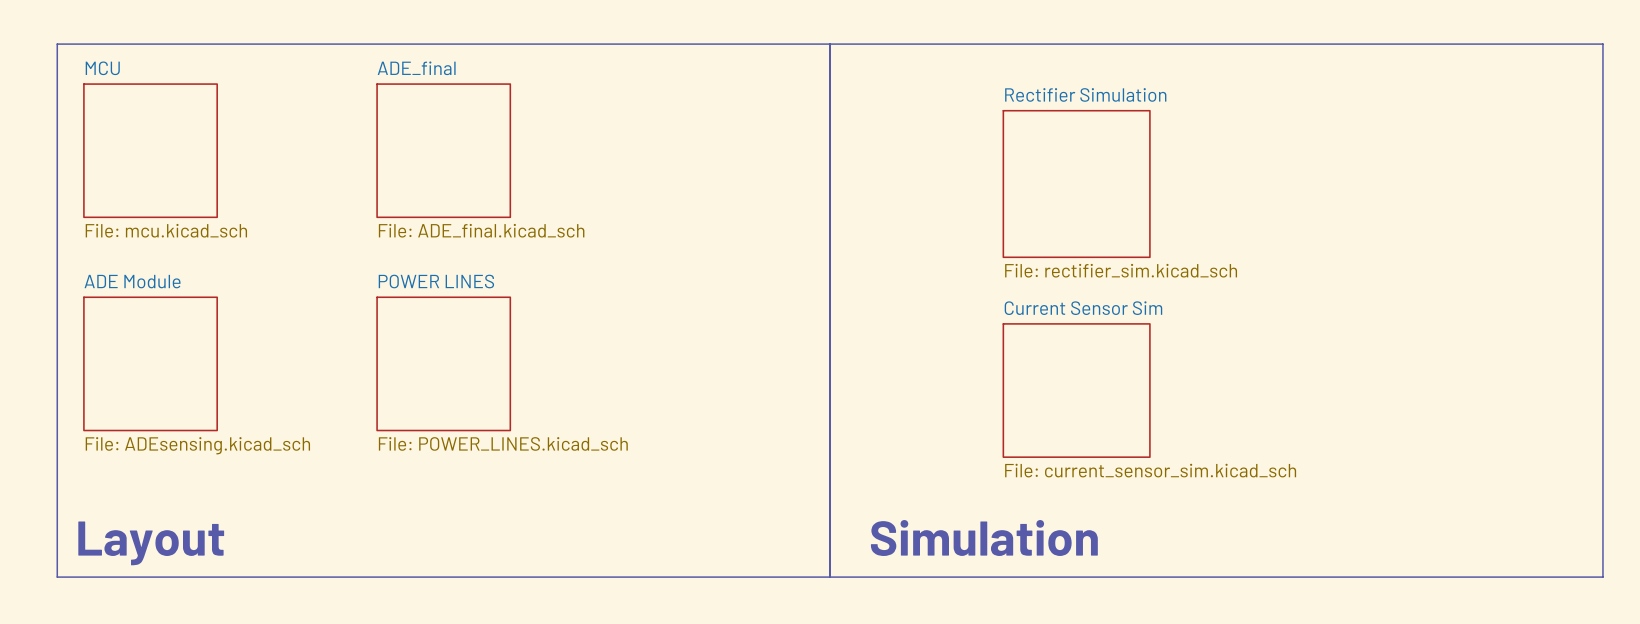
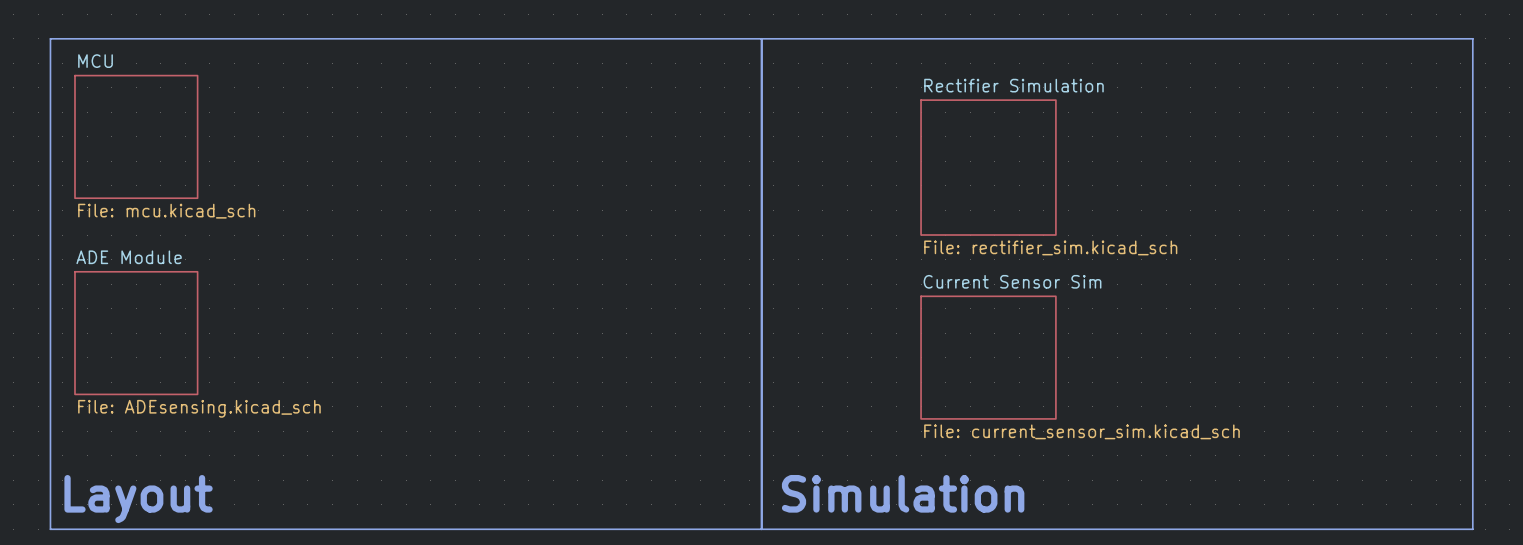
sheet ADE_final: File: ADE_final.kicad_sch (443, 150) -> none
sheet POWER LINES: File: POWER_LINES.kicad_sch (443, 363) -> none

